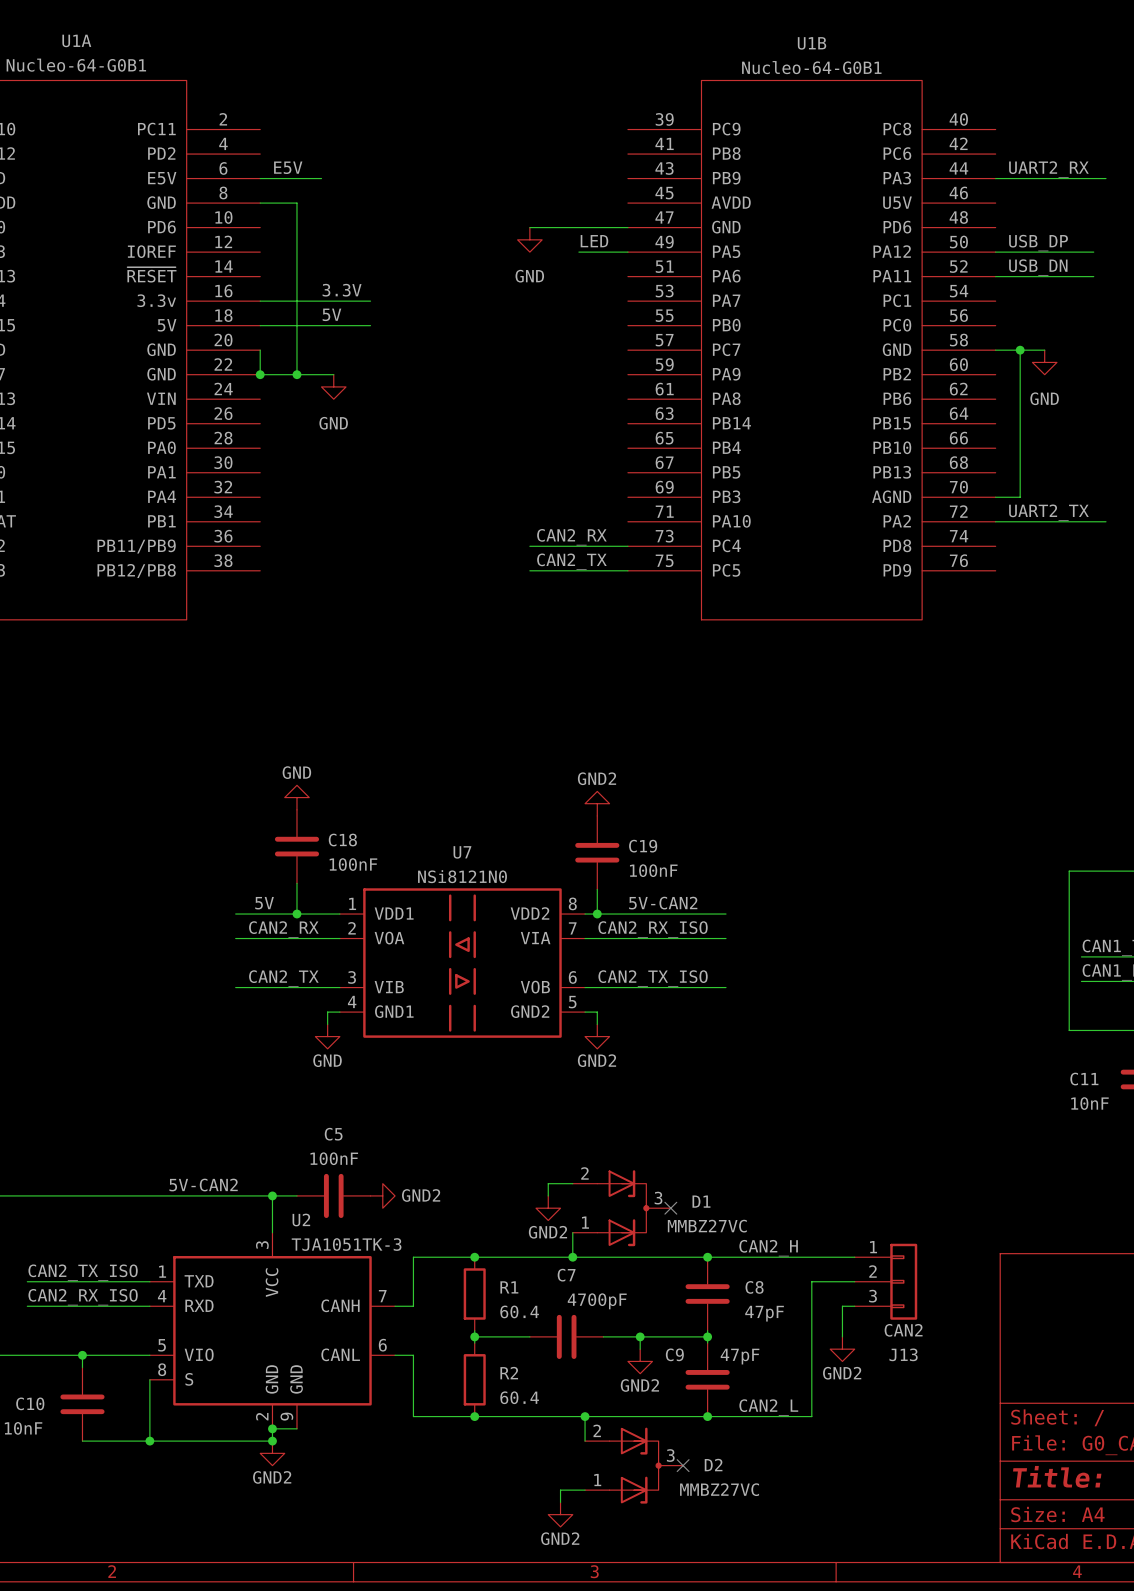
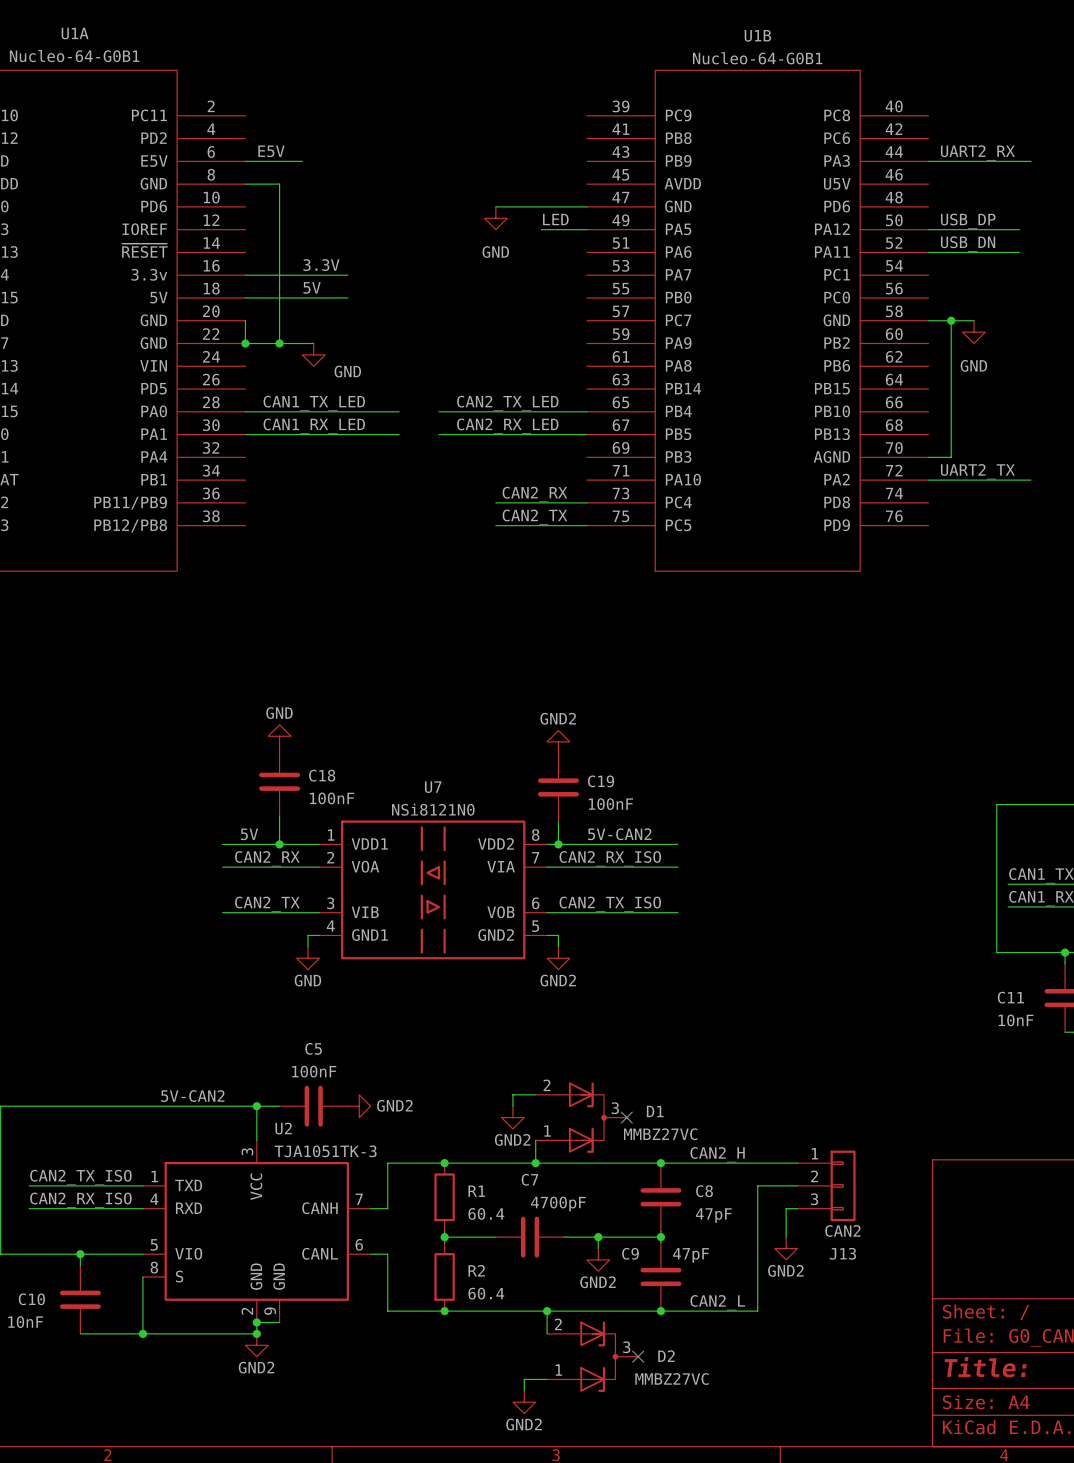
power symbol text position: GND (333, 423) -> GND (347, 371)
label: none -> CAN1_TX_LED (314, 403)
label: none -> CAN2_TX_LED (507, 403)
wire: none -> (245, 411) (399, 411)
wire: none -> (438, 411) (586, 411)
label: none -> CAN1_RX_LED (314, 426)
label: none -> CAN2_RX_LED (507, 426)
wire: none -> (245, 434) (399, 434)
wire: none -> (438, 434) (586, 434)

